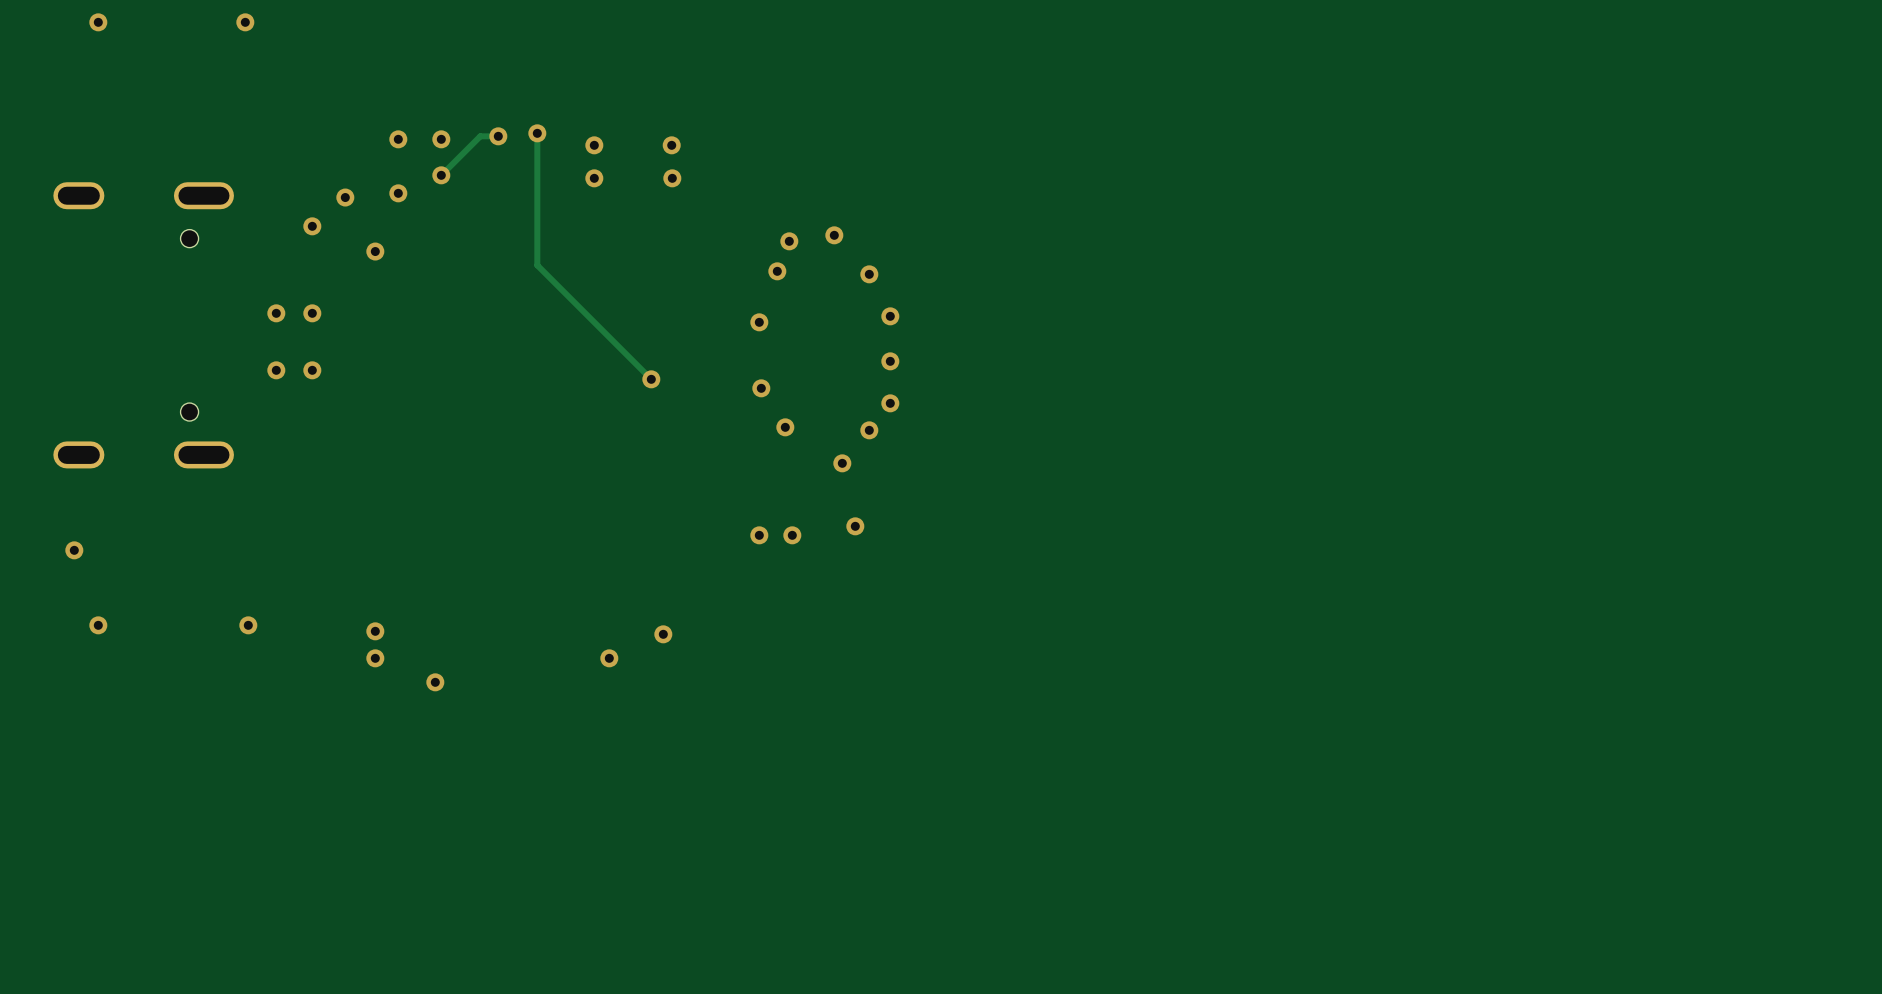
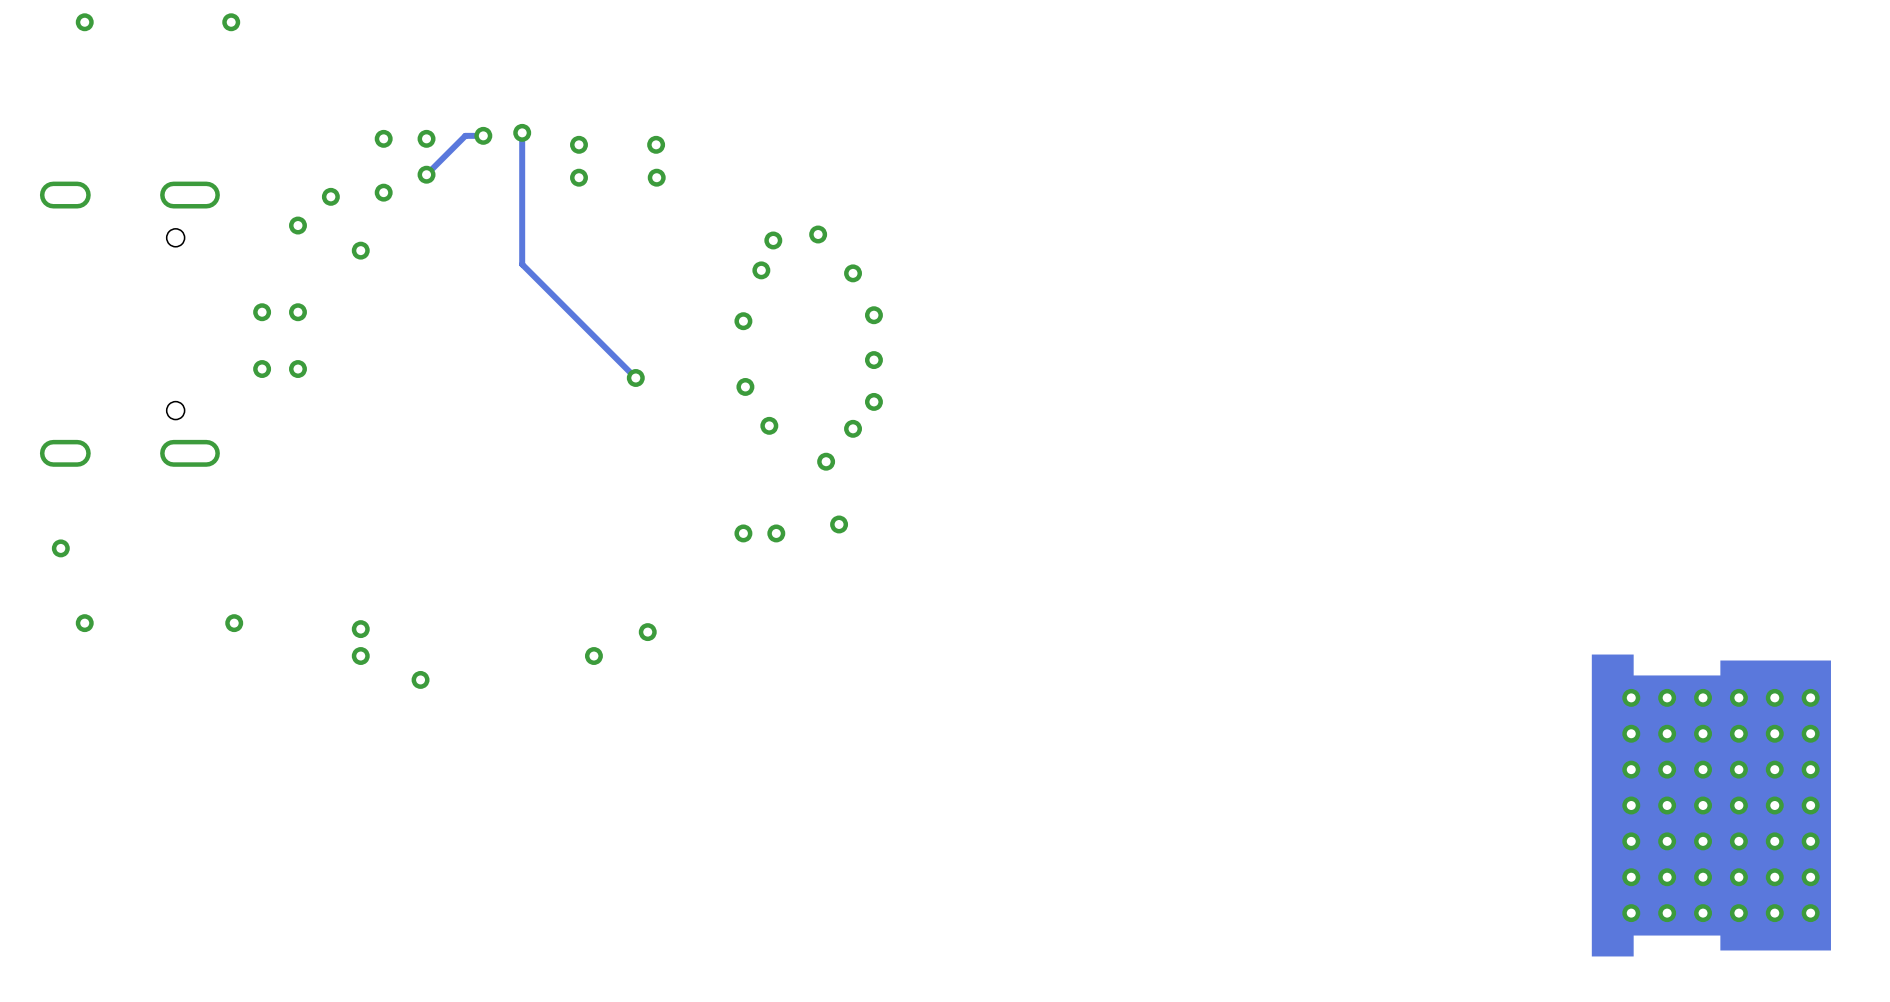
part: none -> (1711, 805)

